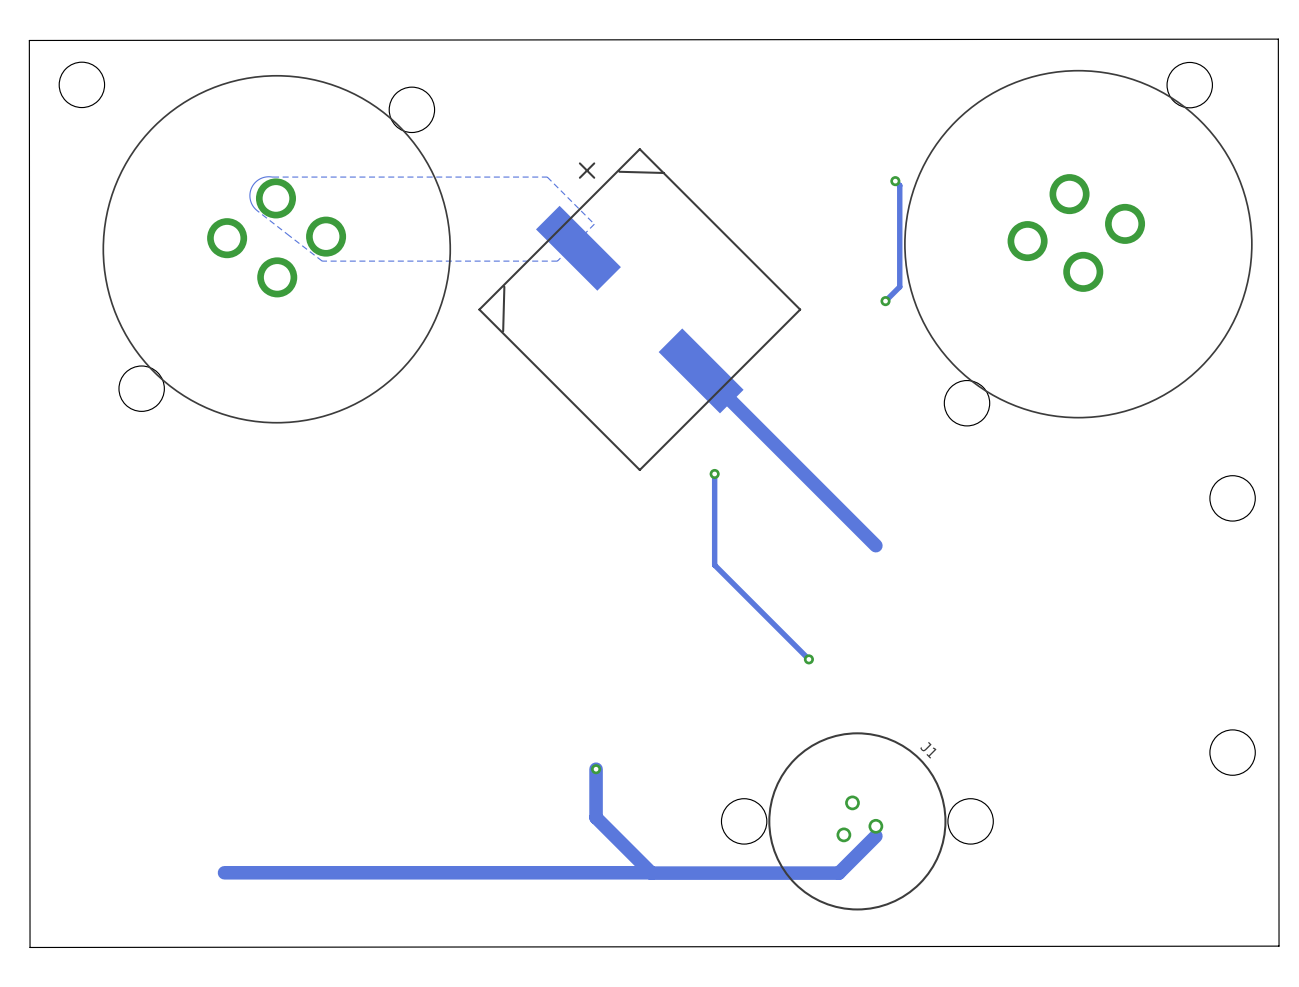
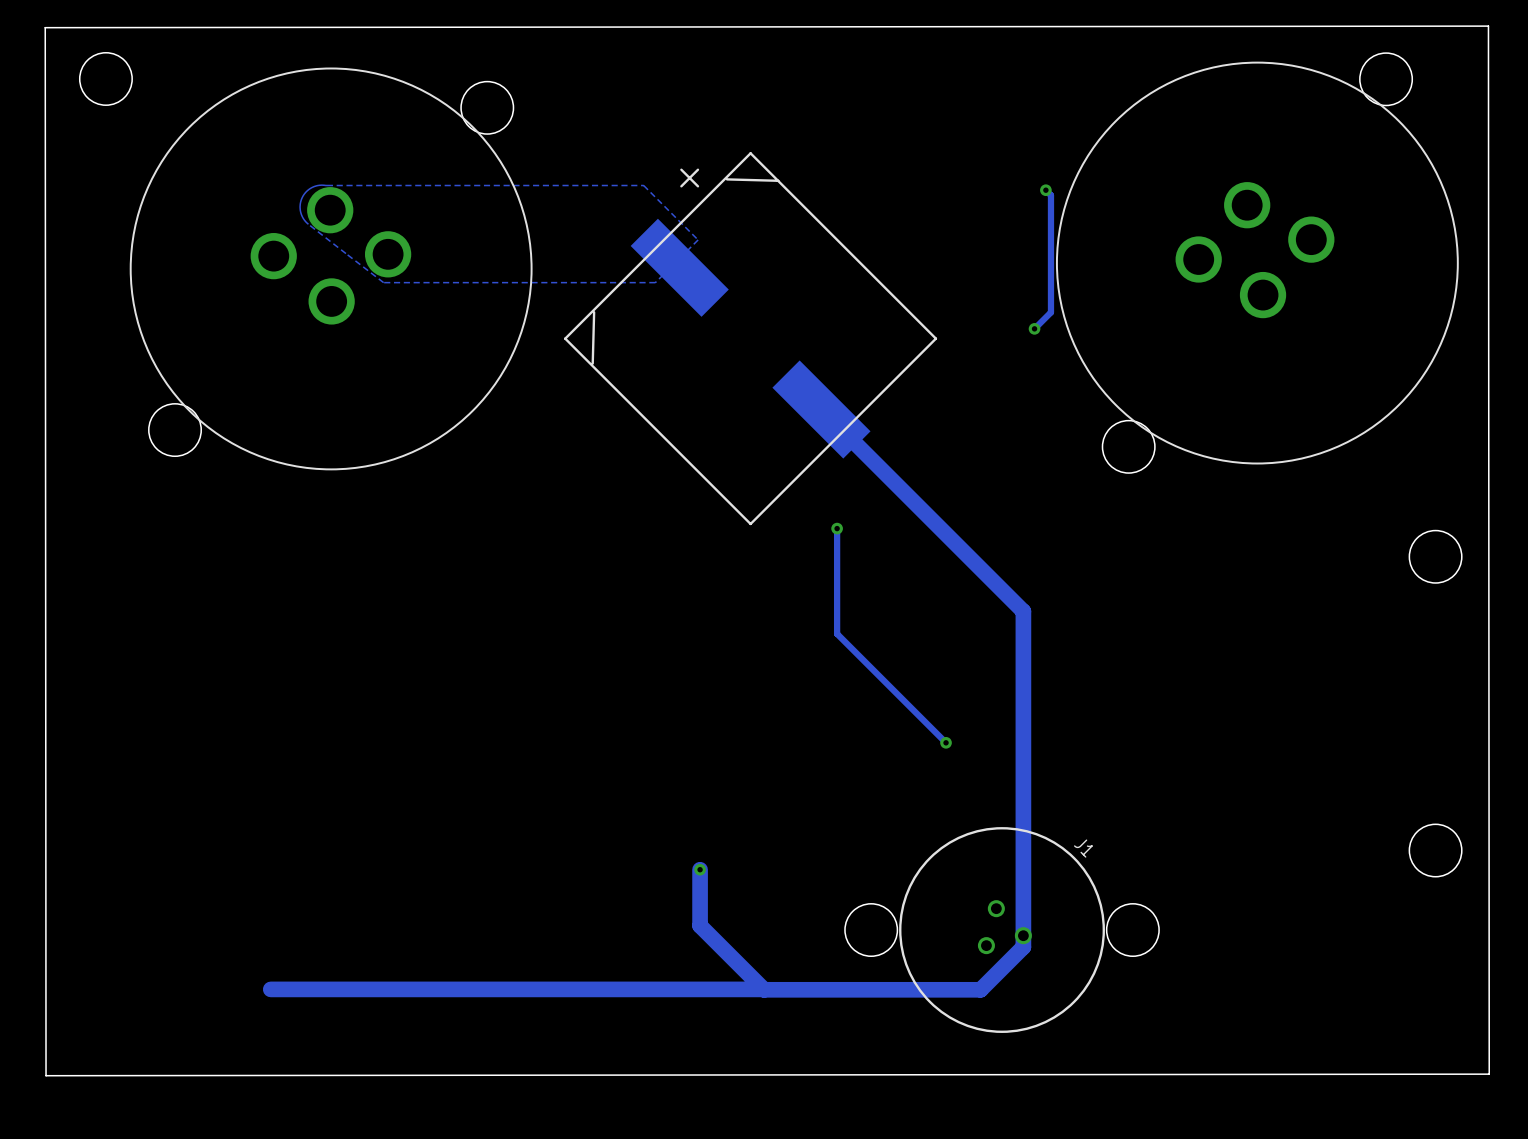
track: none -> (1023, 611) (1023, 947)

